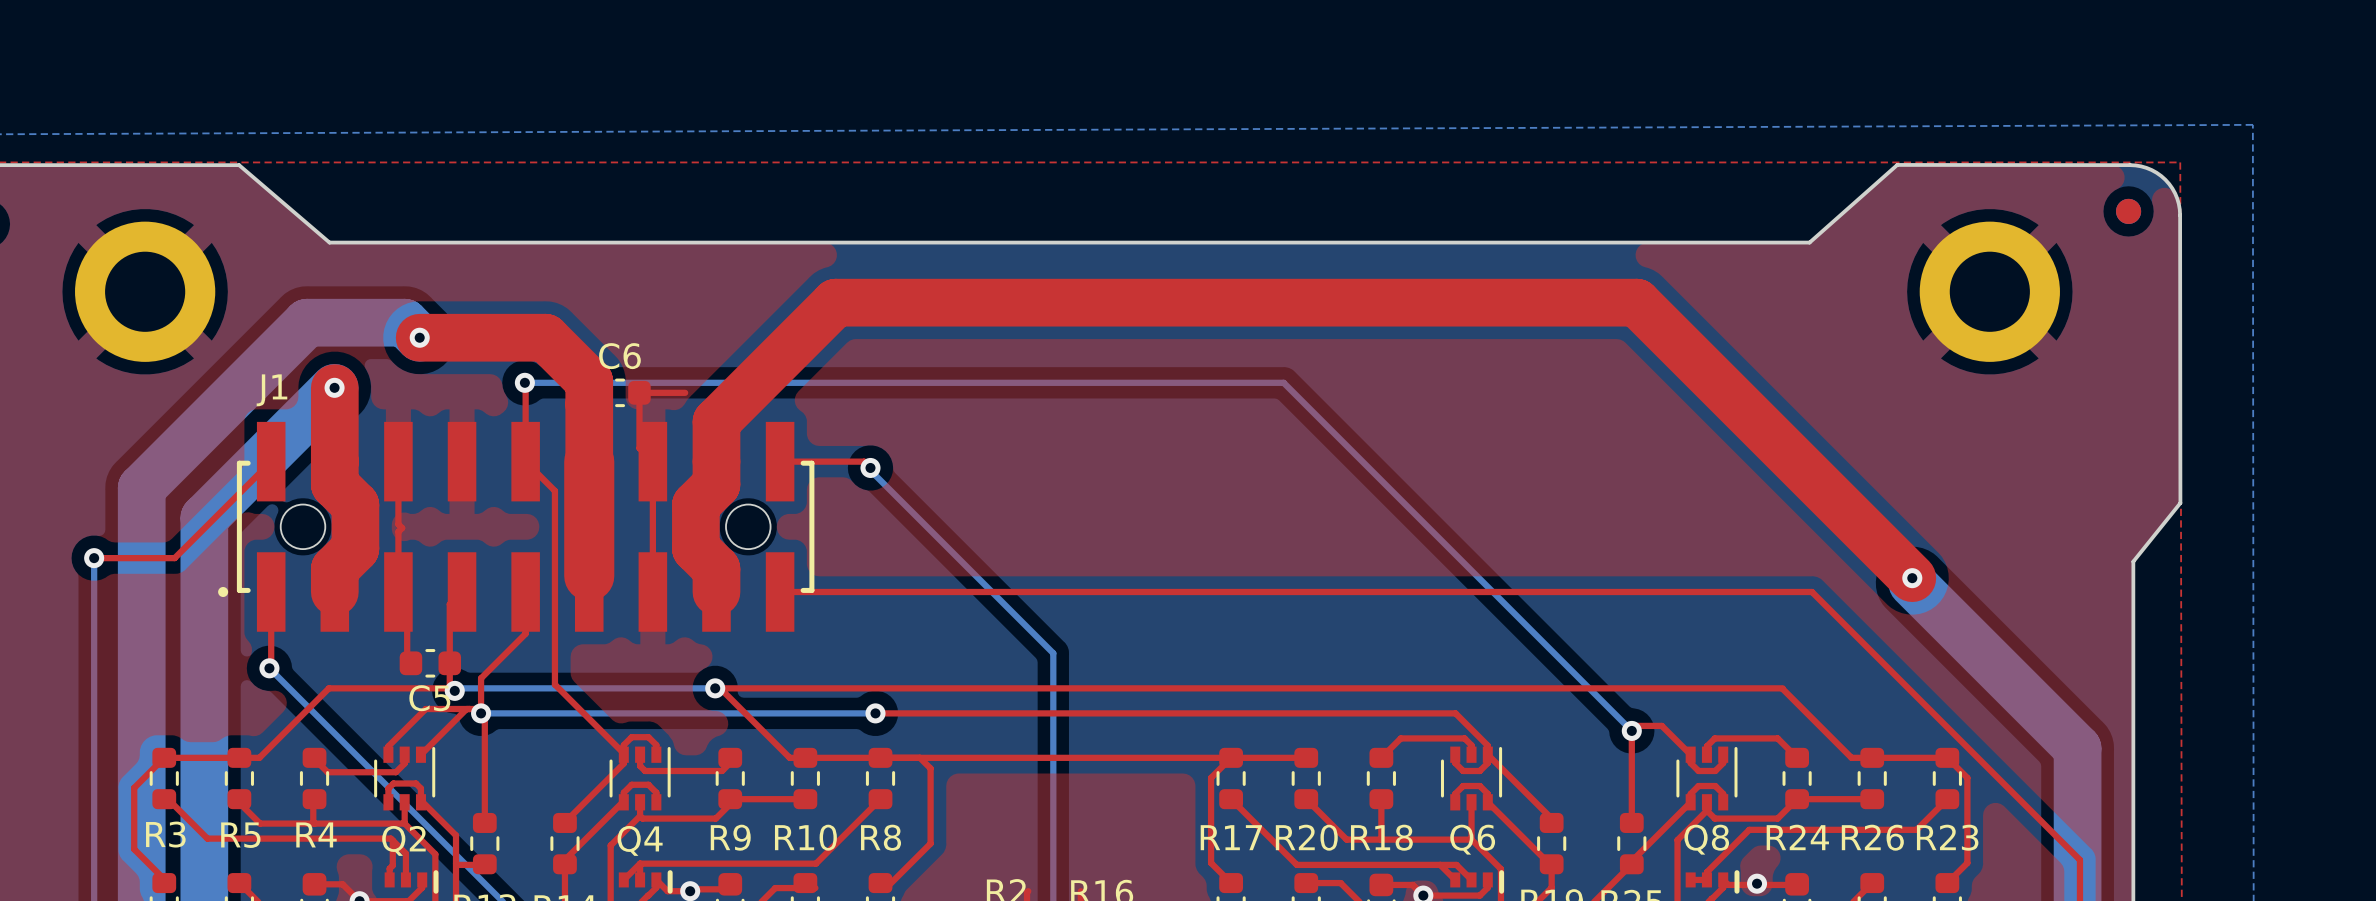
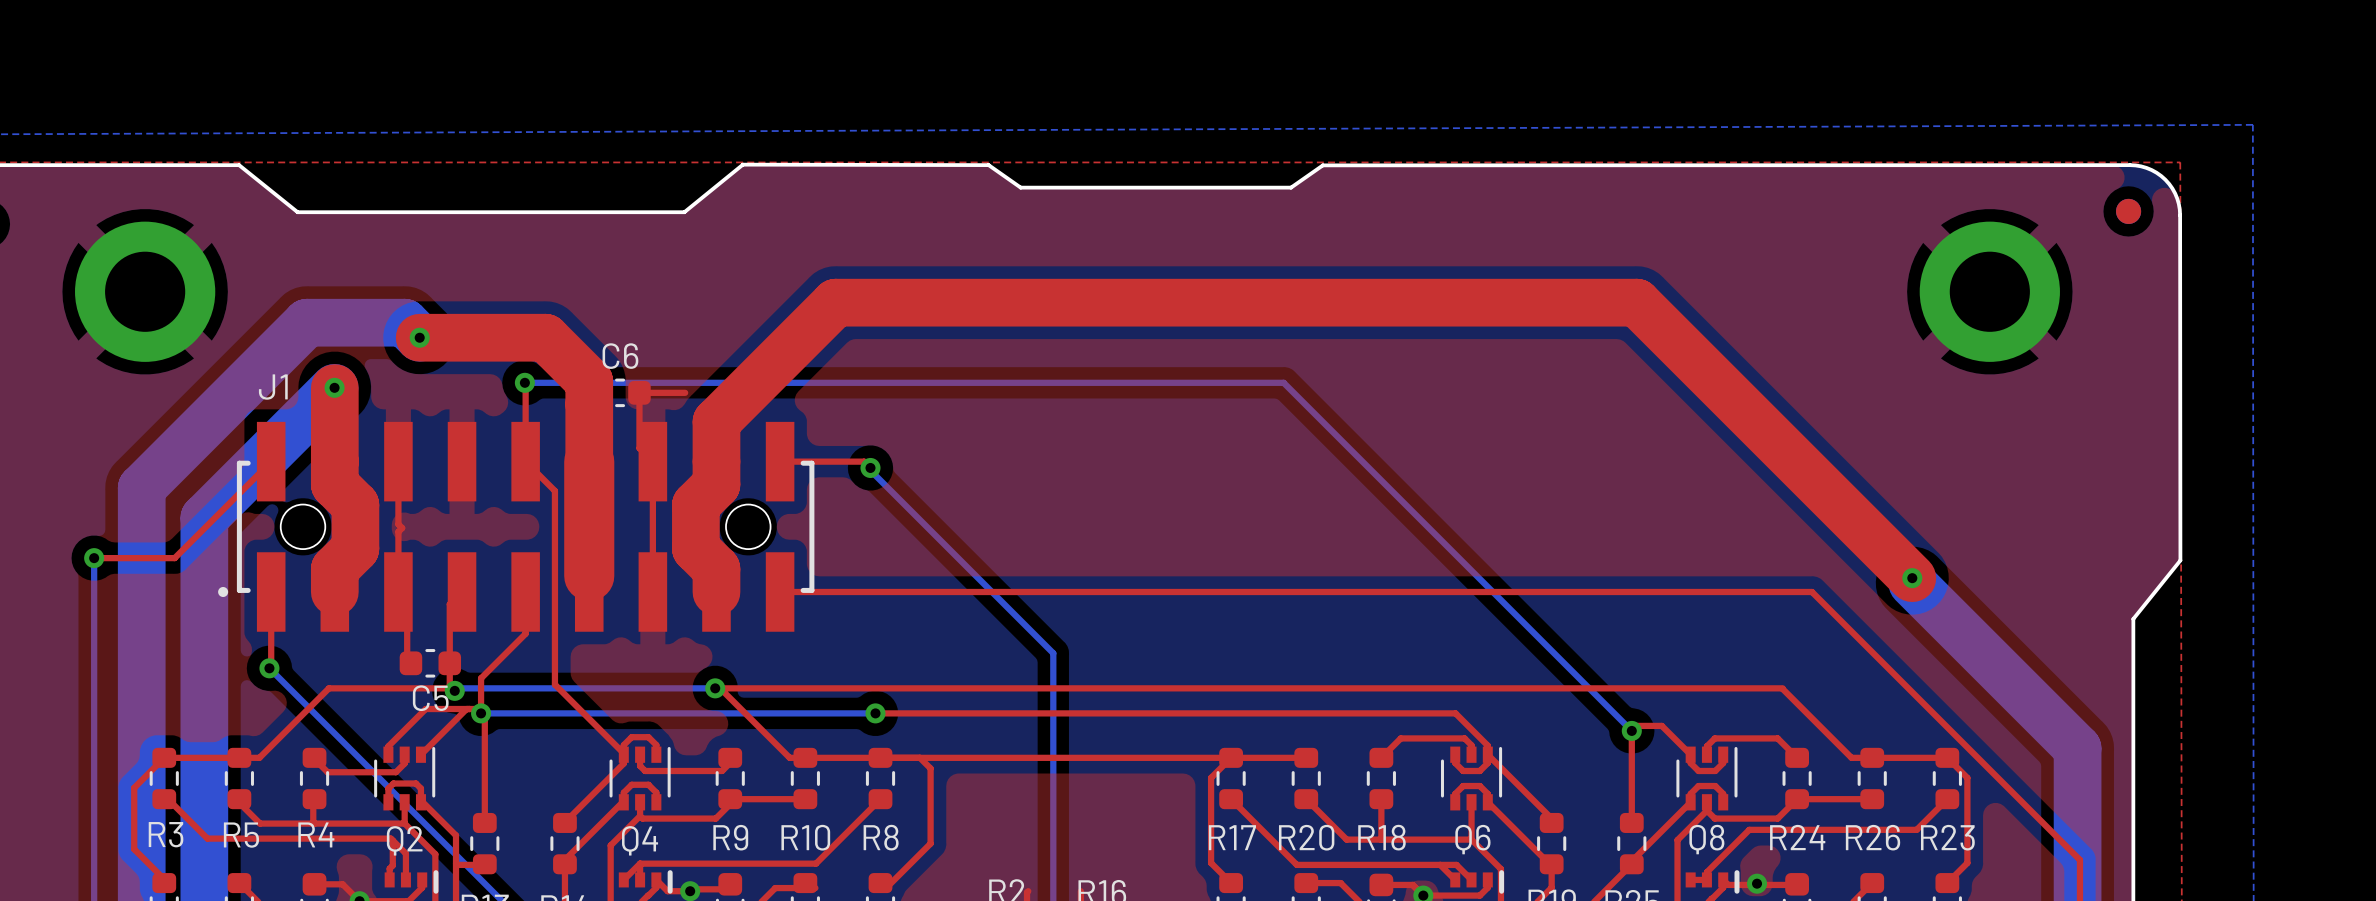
board edge: (239, 165) (329, 242) (1809, 242) (1897, 164) (2130, 165) -> (239, 165) (297, 212) (684, 212) (742, 164) (988, 165) (1020, 187) (1291, 187) (1322, 165) (2130, 165)
board edge: (2180, 215) (2180, 503) (2133, 561) (2133, 618) -> (2180, 215) (2180, 560) (2133, 618)

